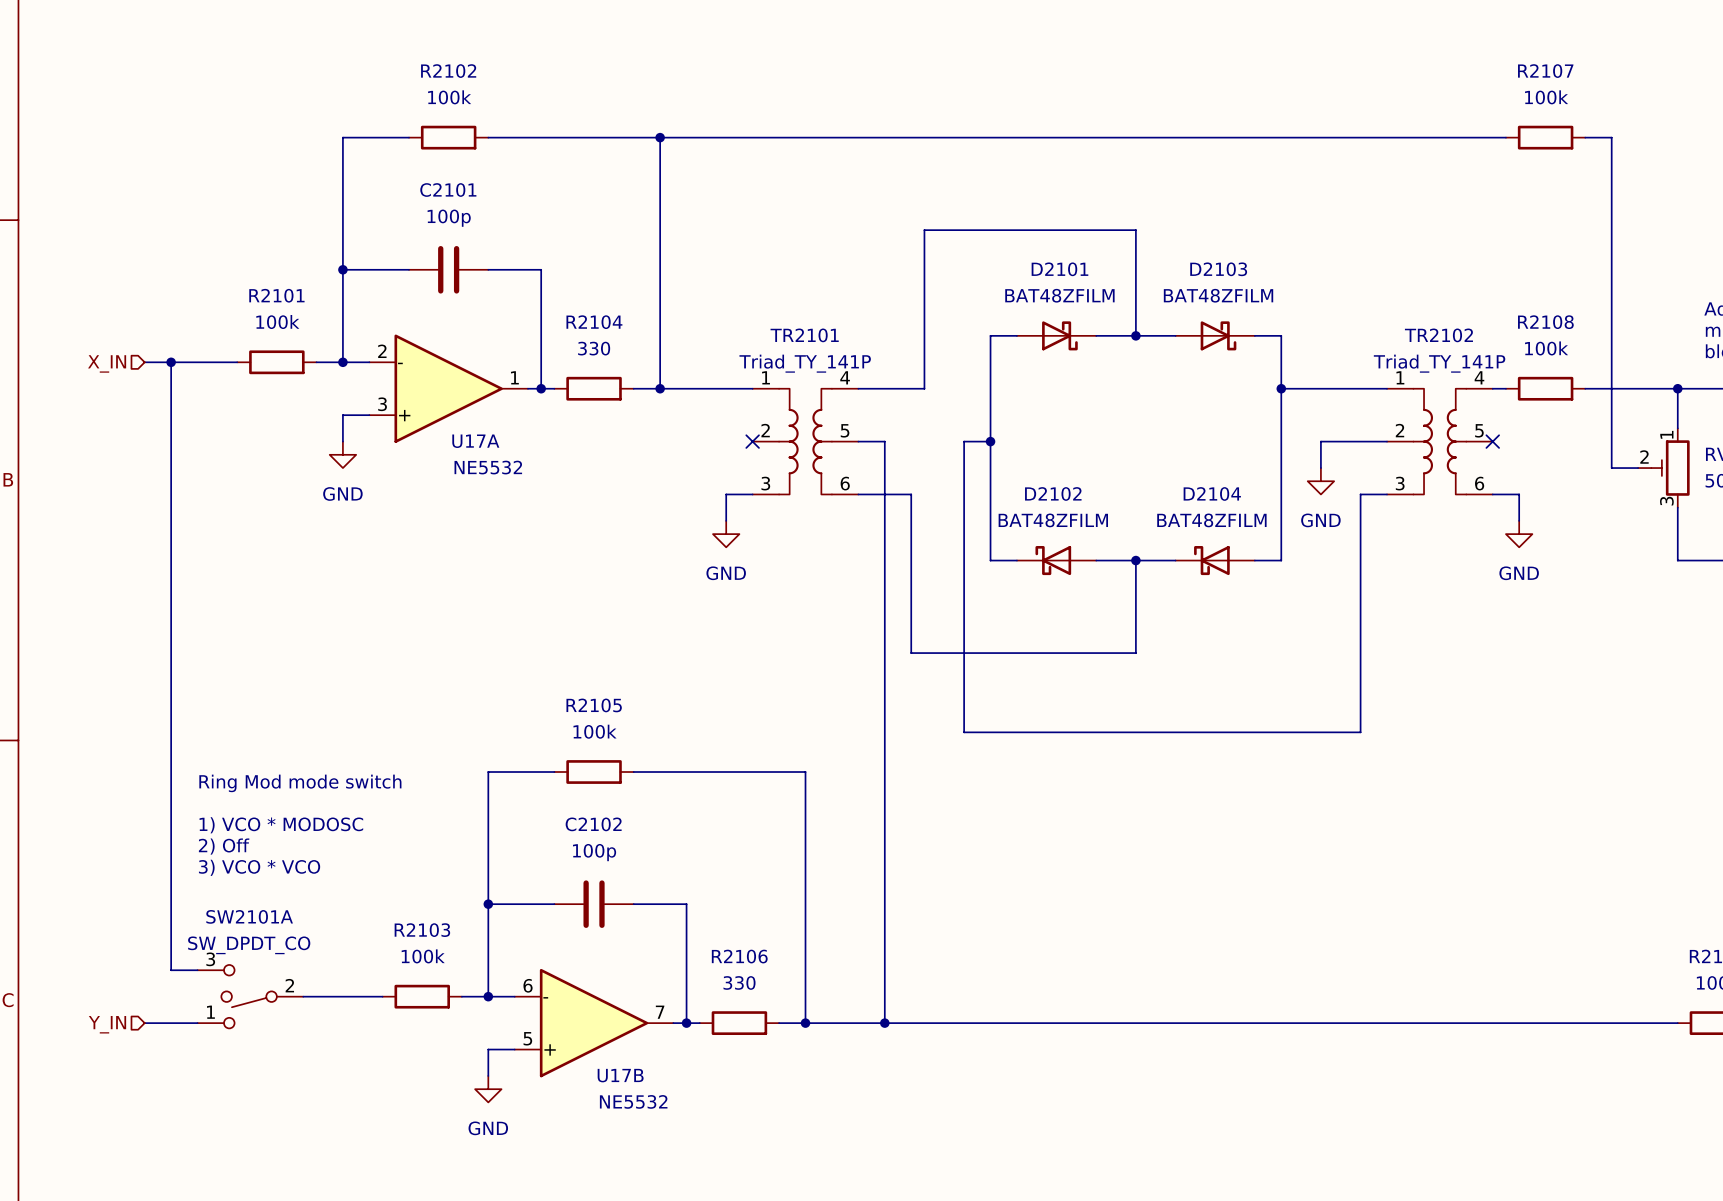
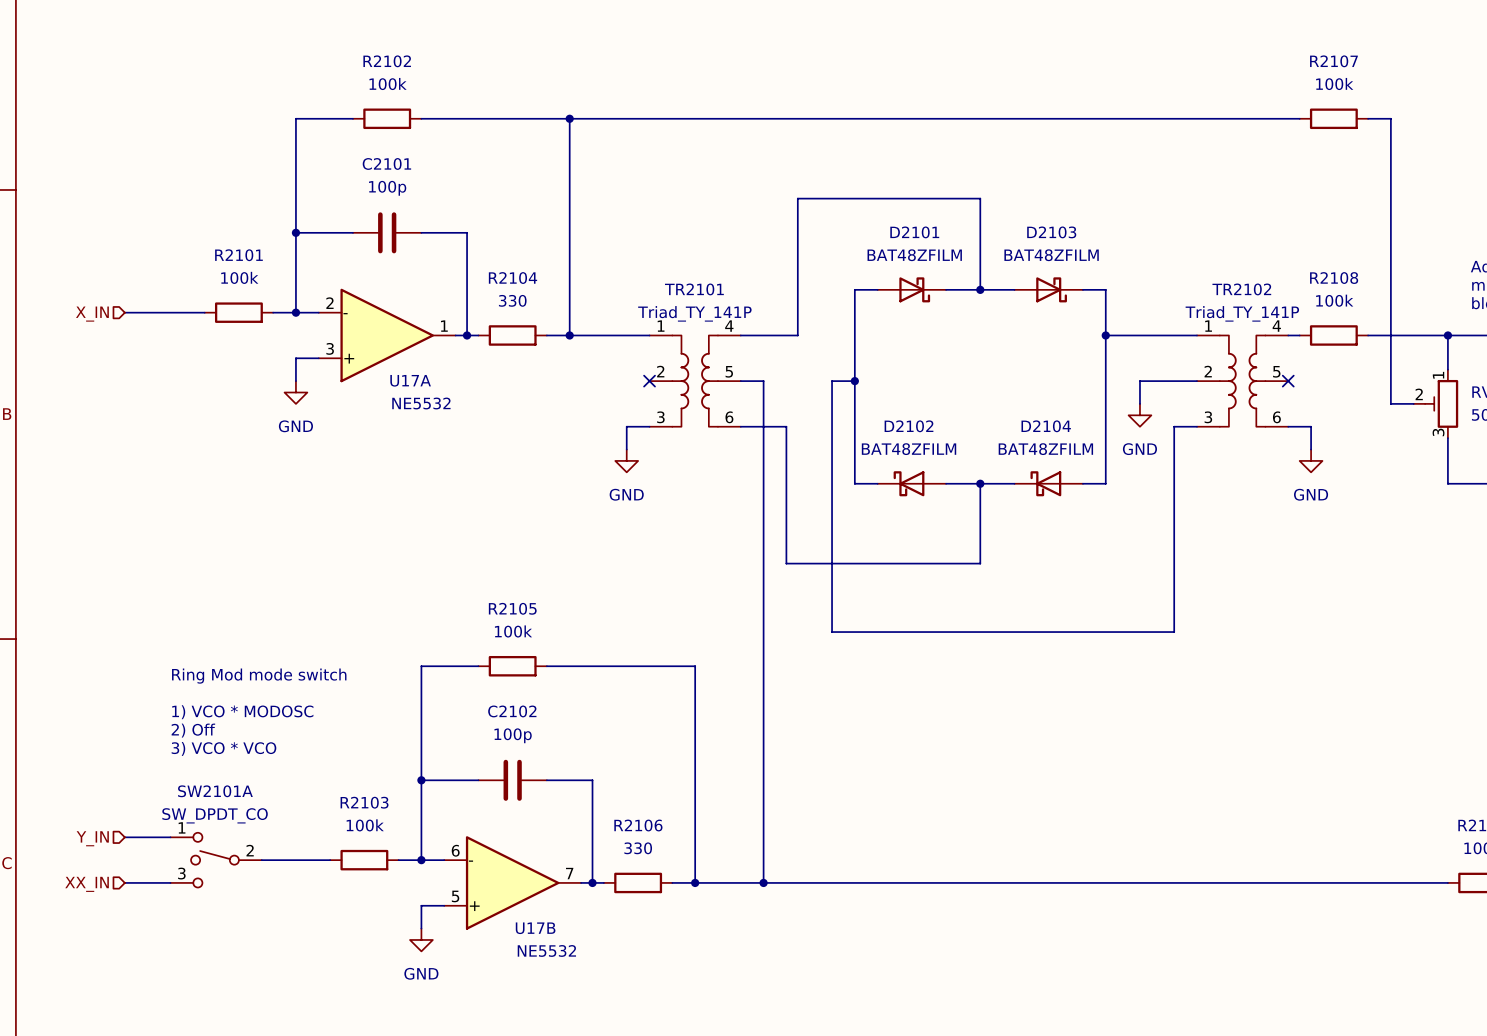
wire: (171, 362) (171, 970) -> (124, 837) (147, 837)
junction: (171, 362) -> none
hierarchical label: none -> Y_IN (92, 838)
SW2101A flip: as is (249, 996) -> up-down (214, 860)
hierarchical label: Y_IN (107, 1024) -> XX_IN (87, 884)

